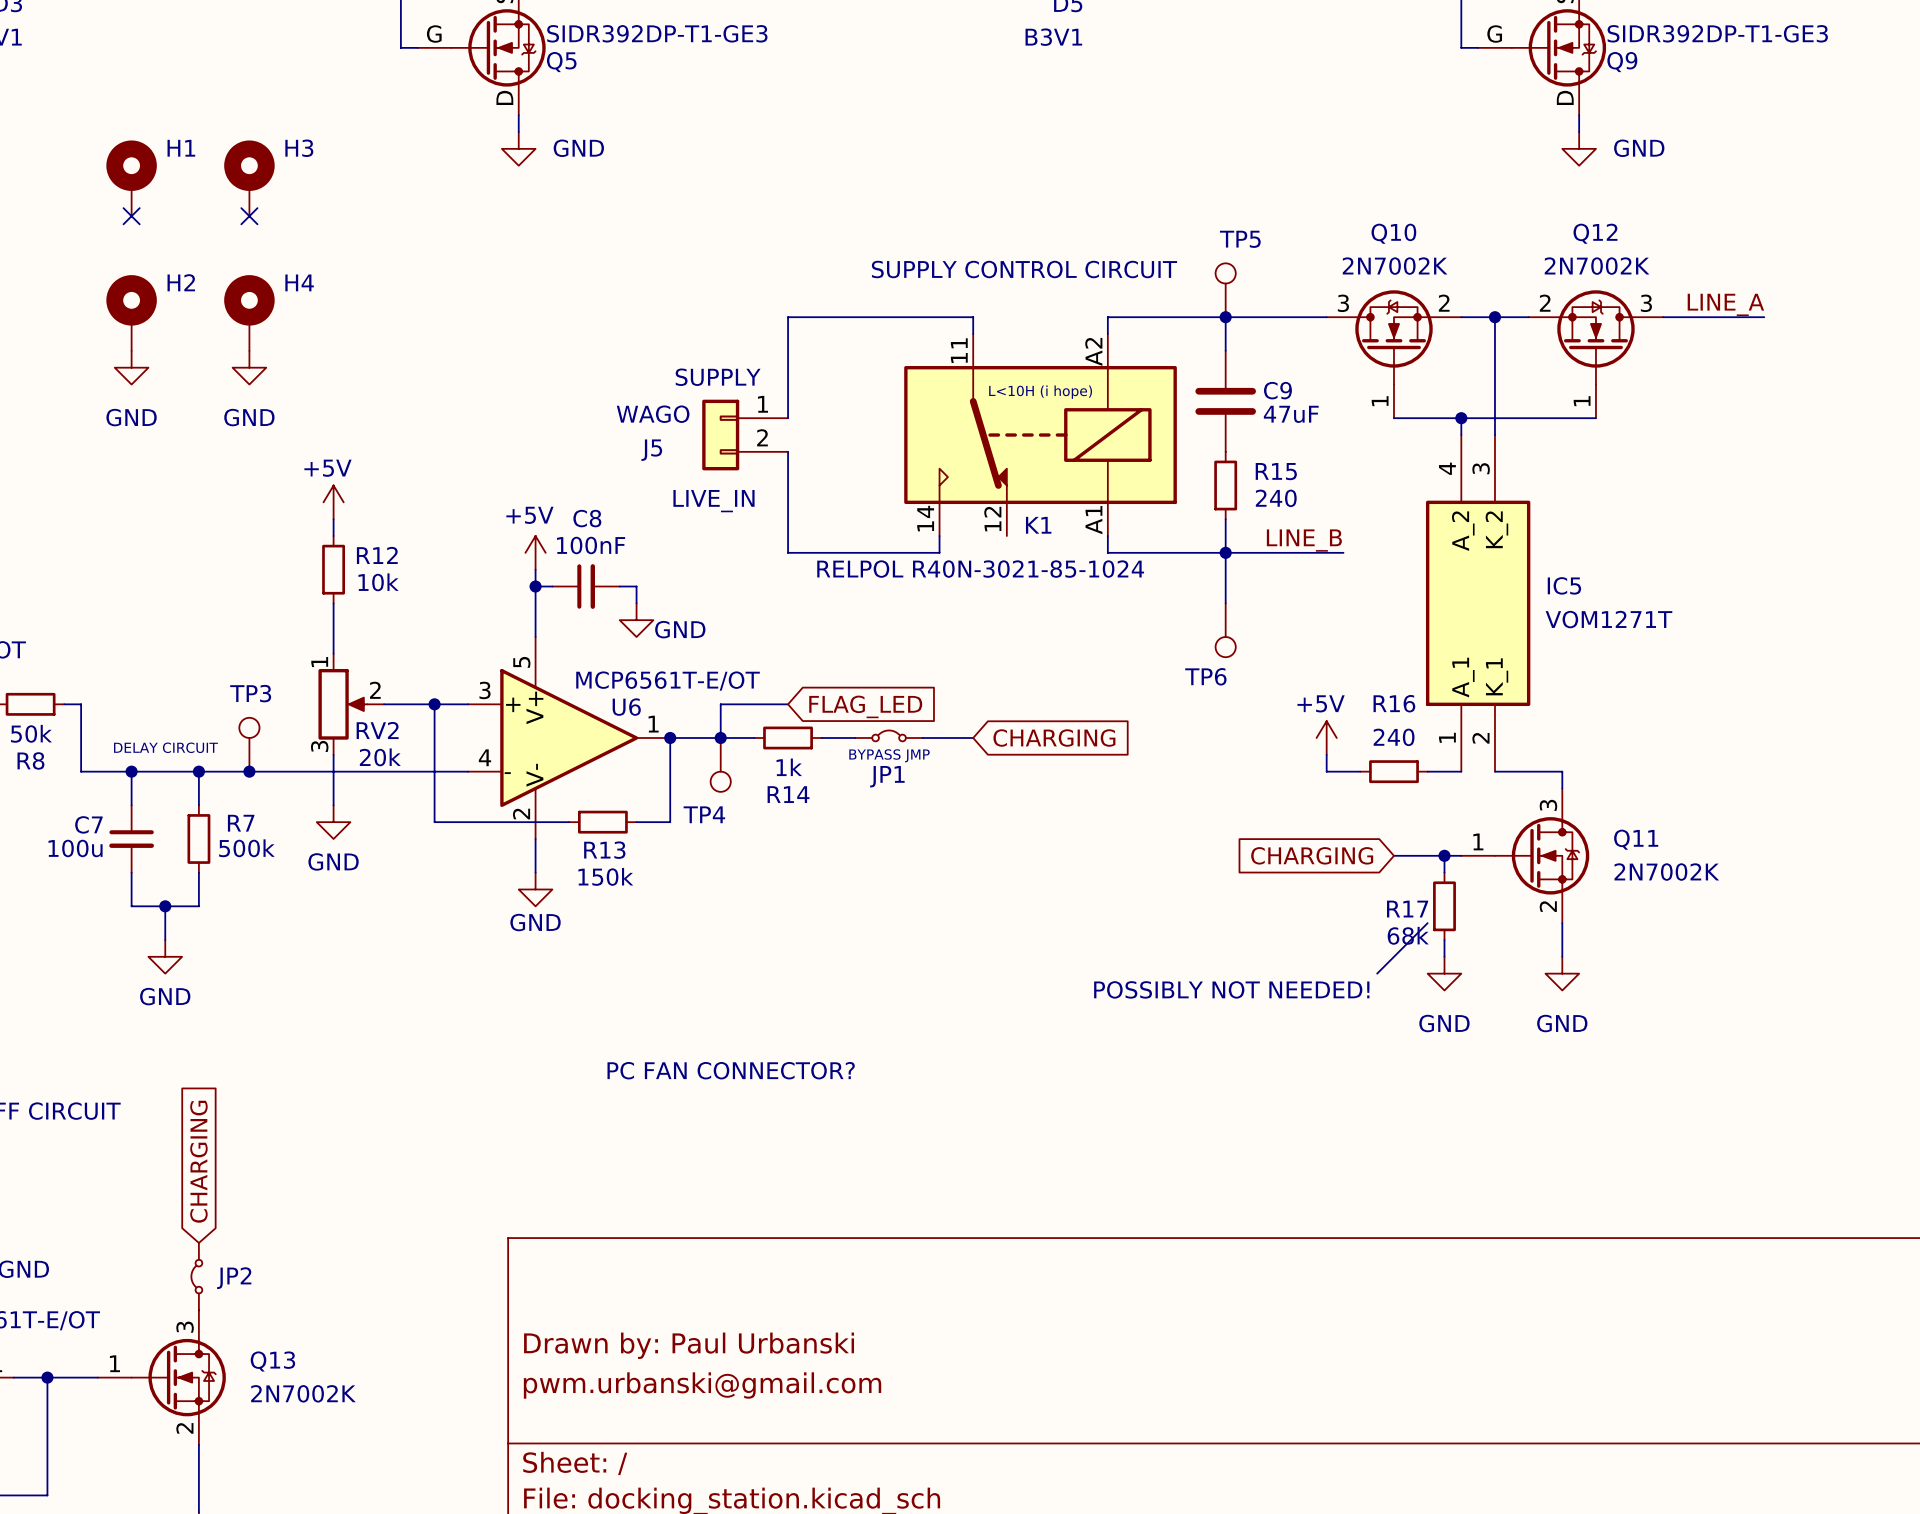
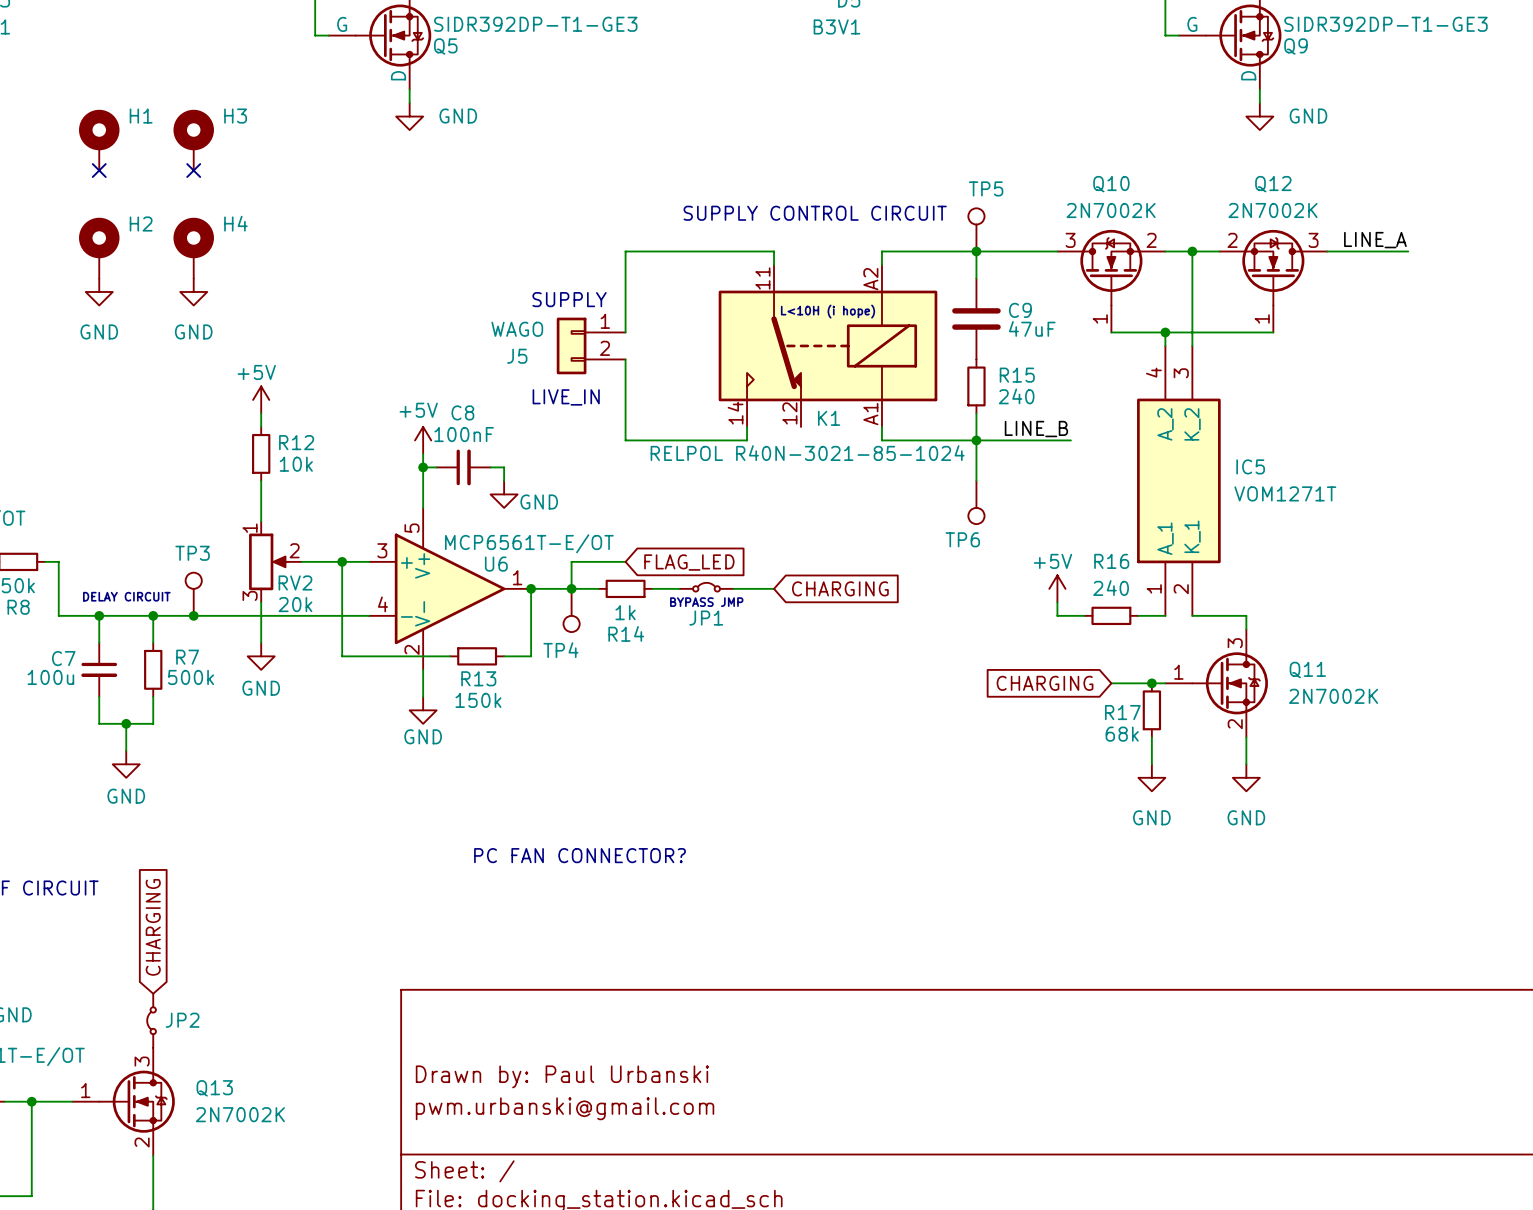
R17 position: (1444, 906) -> (1151, 710)
line: (1427, 923) (1377, 973) -> none
text: POSSIBLY NOT NEEDED! (1231, 989) -> none

